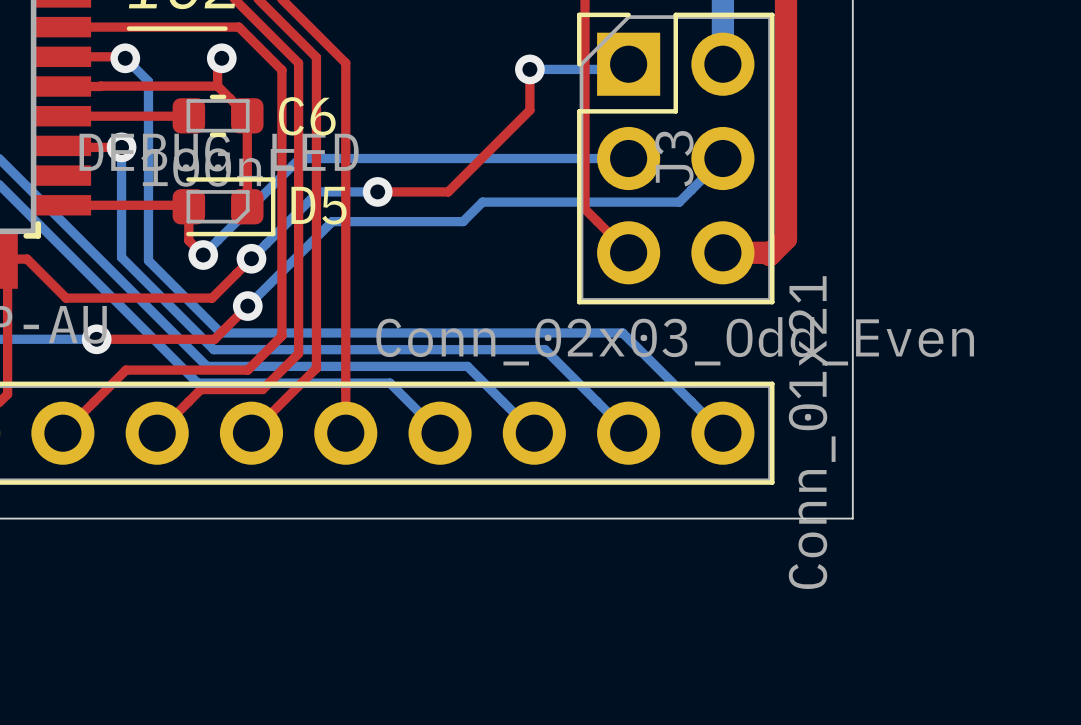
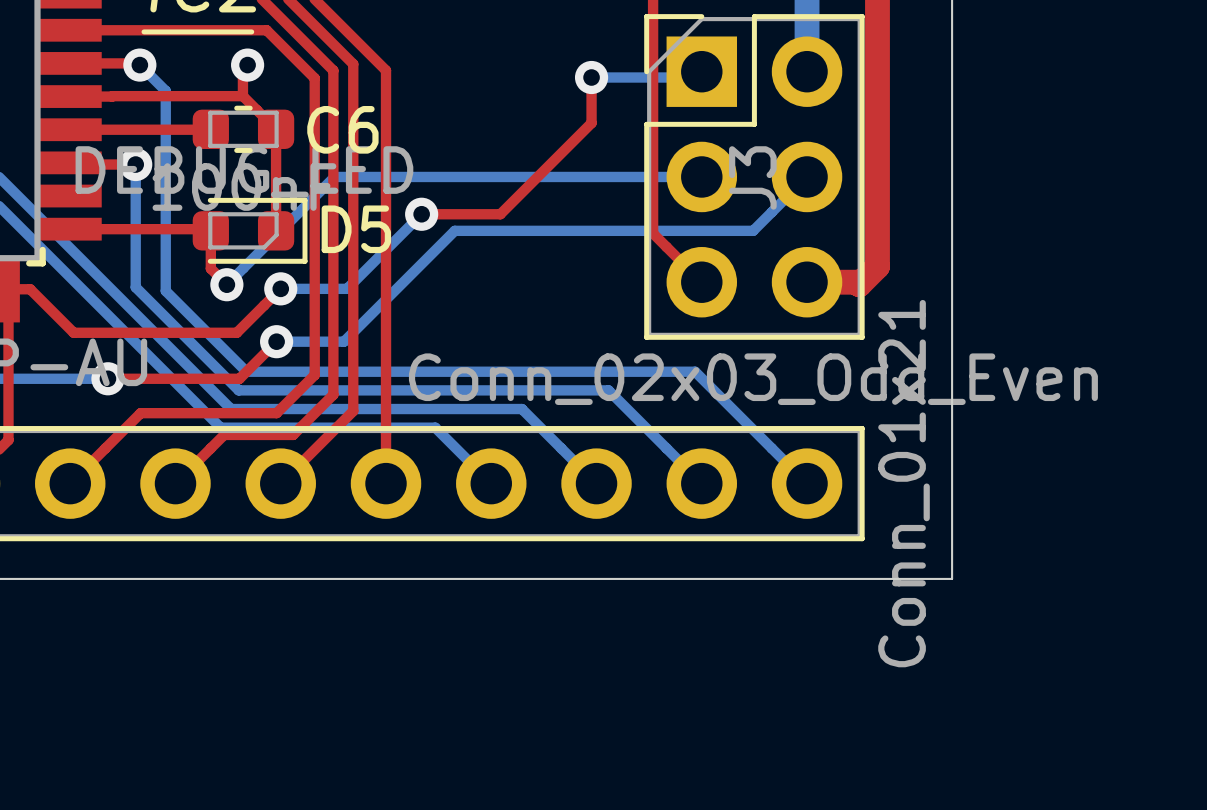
bottom track: (377, 191) (318, 191) (251, 258) -> (421, 214) (347, 288) (280, 288)
bottom track: (679, 202) (482, 202) (463, 221) (332, 221) (247, 306) -> (758, 225) (753, 230) (454, 230) (343, 341) (276, 341)

